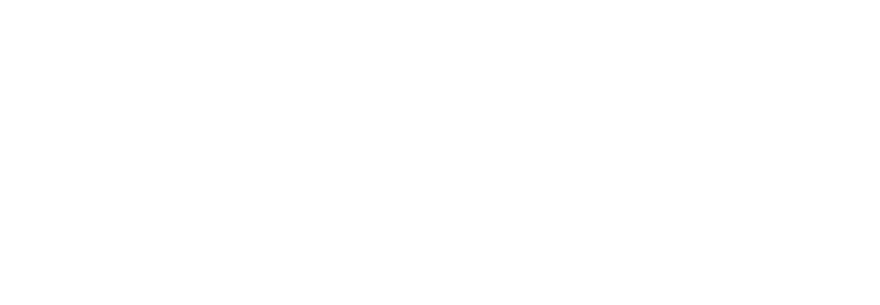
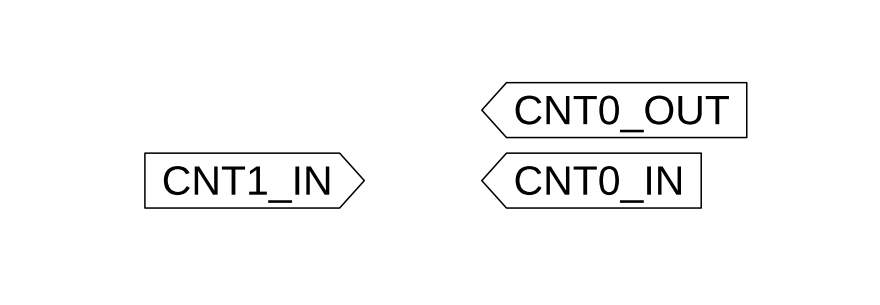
global label: none -> CNT0_OUT (622, 113)
global label: none -> CNT1_IN (246, 184)
global label: none -> CNT0_IN (598, 184)

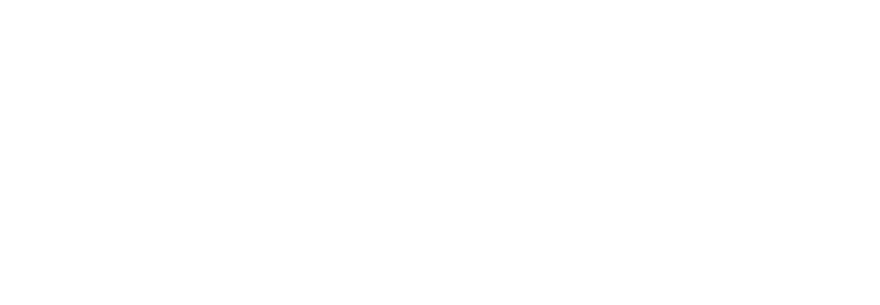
global label: CNT0_OUT (622, 113) -> none
global label: CNT1_IN (246, 184) -> none
global label: CNT0_IN (598, 184) -> none

